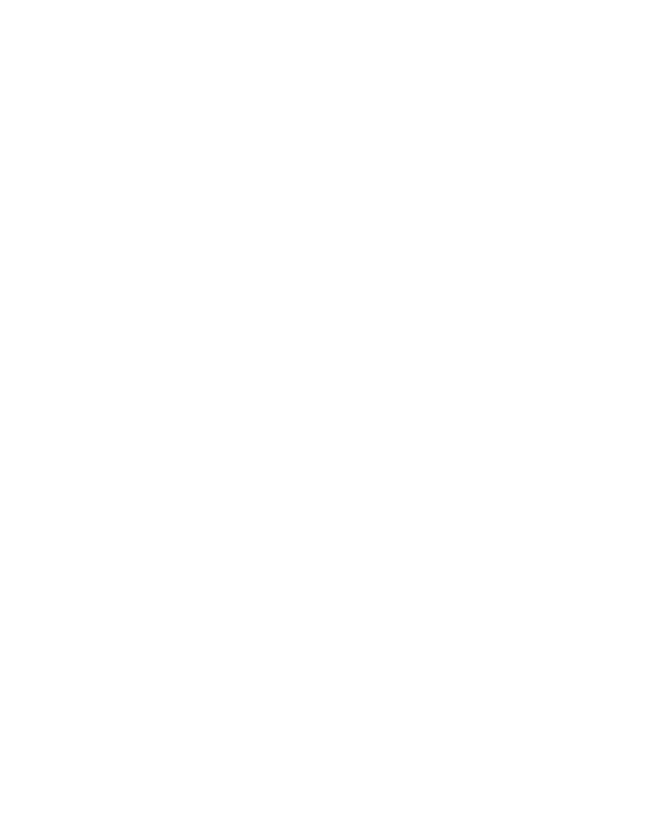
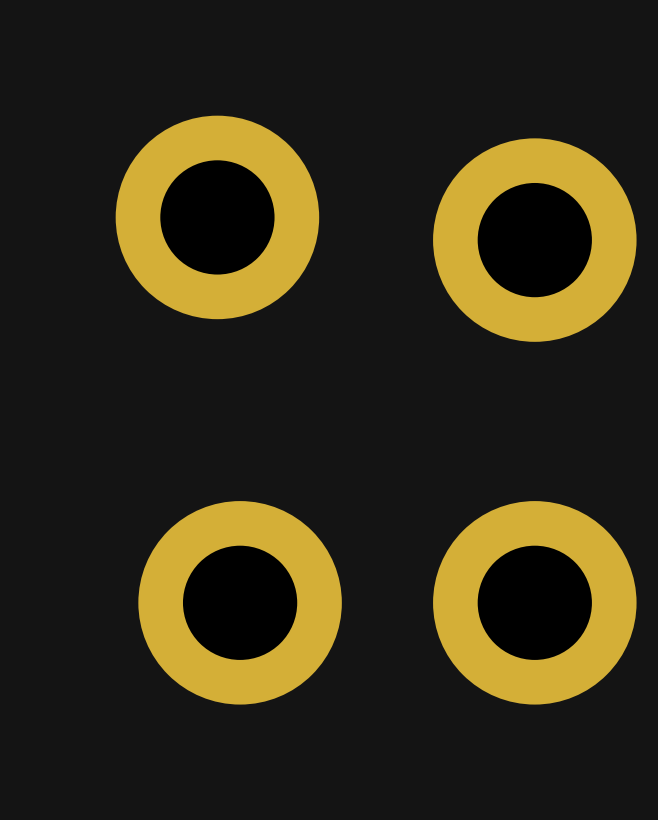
part: none -> (217, 217)
part: none -> (534, 240)
part: none -> (240, 602)
part: none -> (534, 602)

